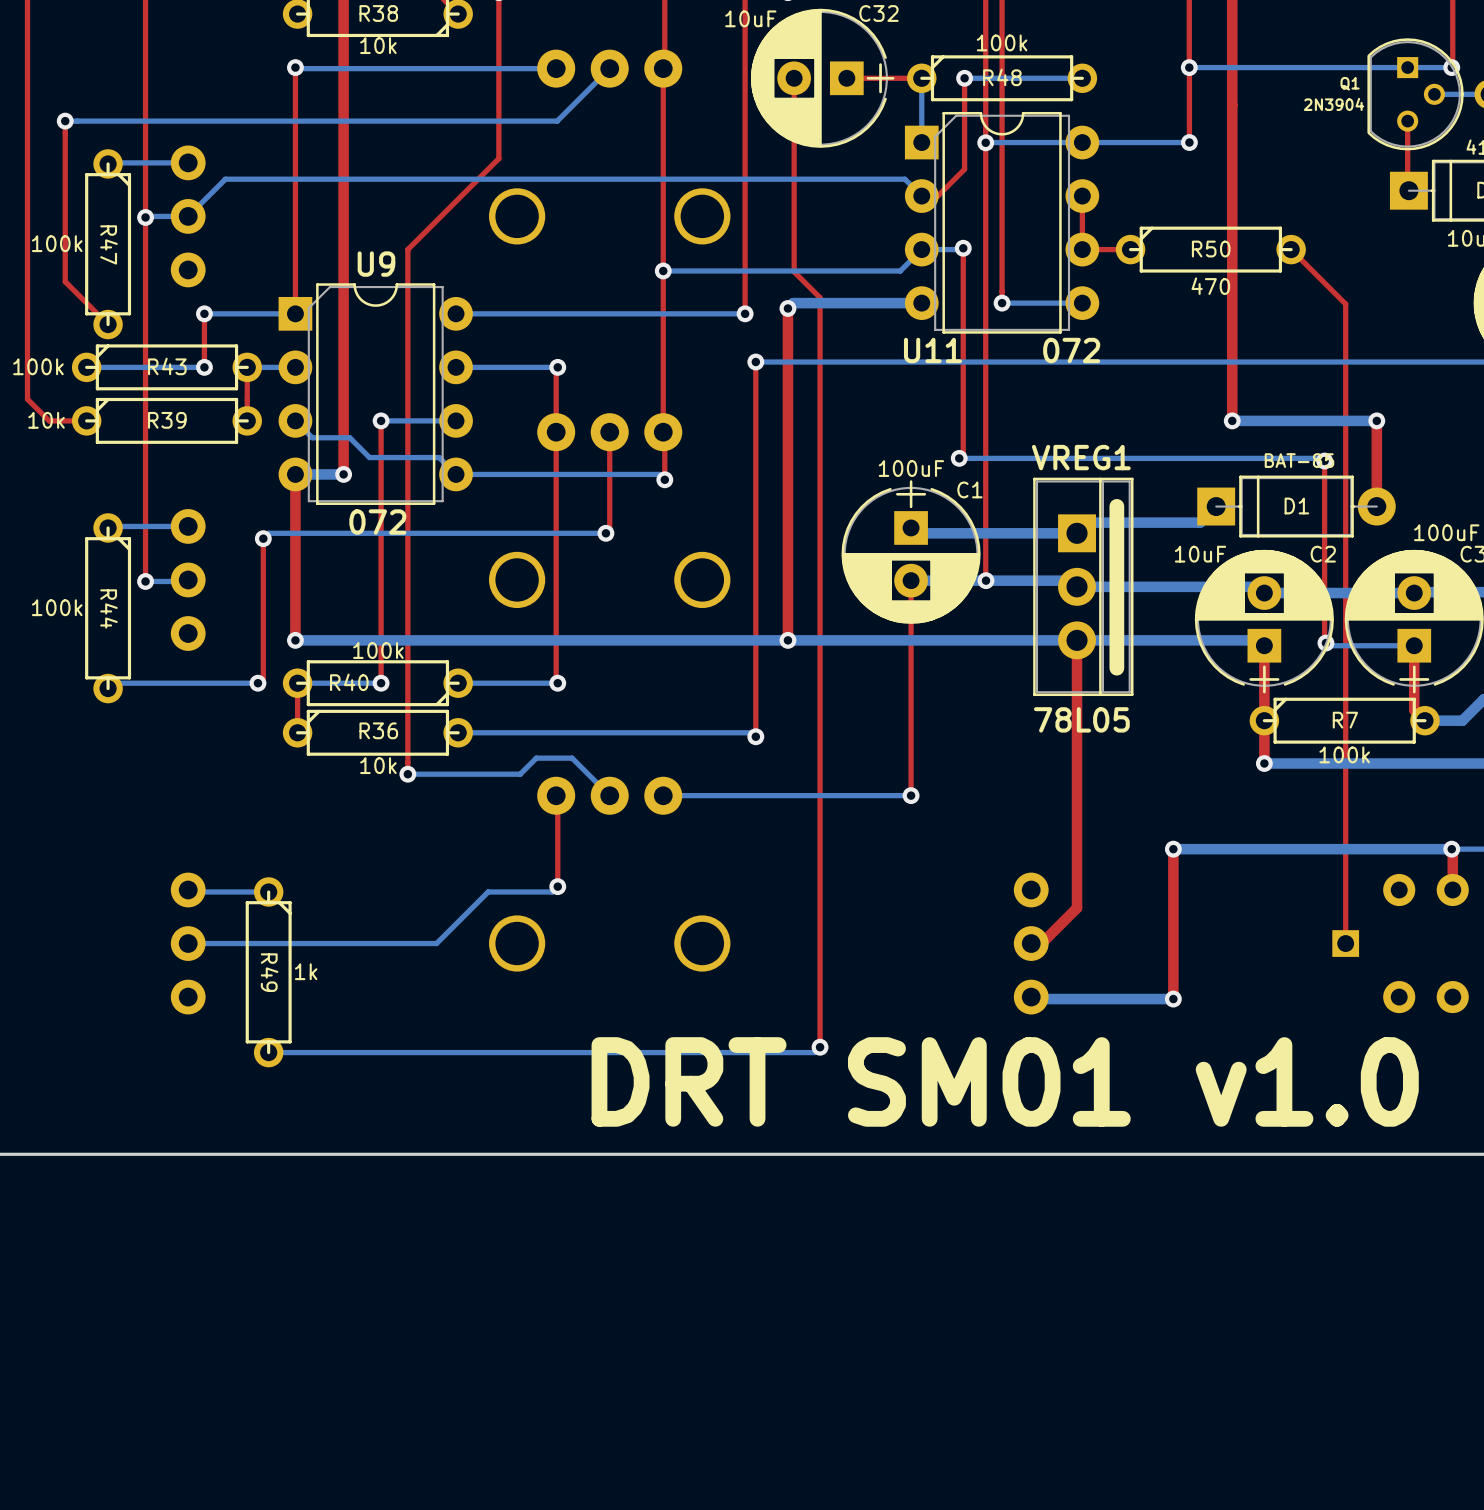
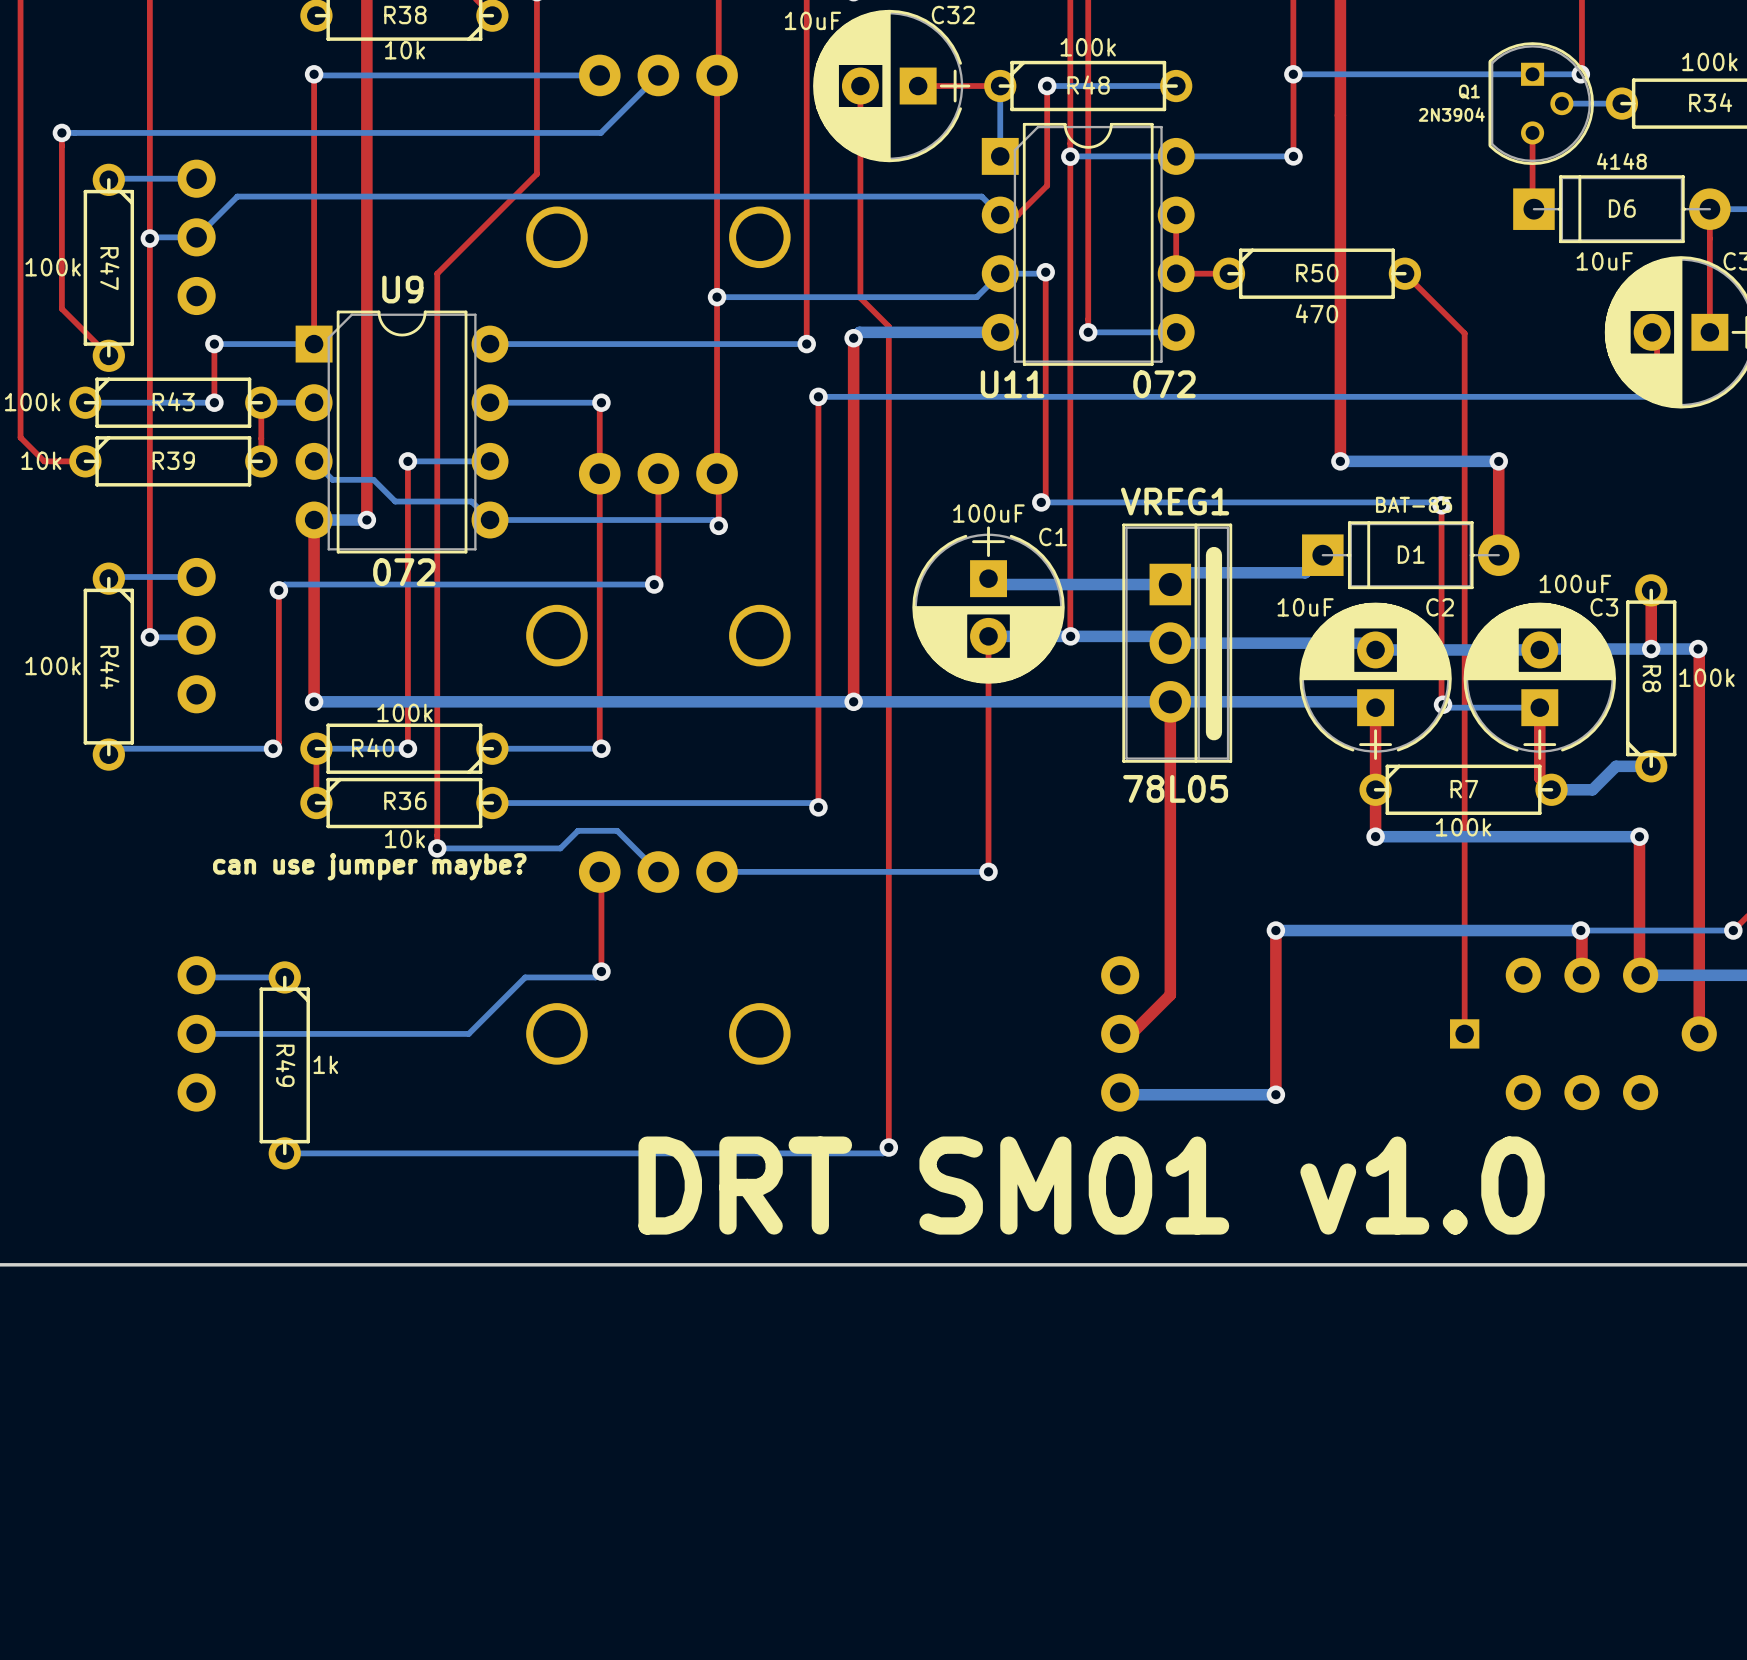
text: none -> can use jumper maybe? (369, 866)

